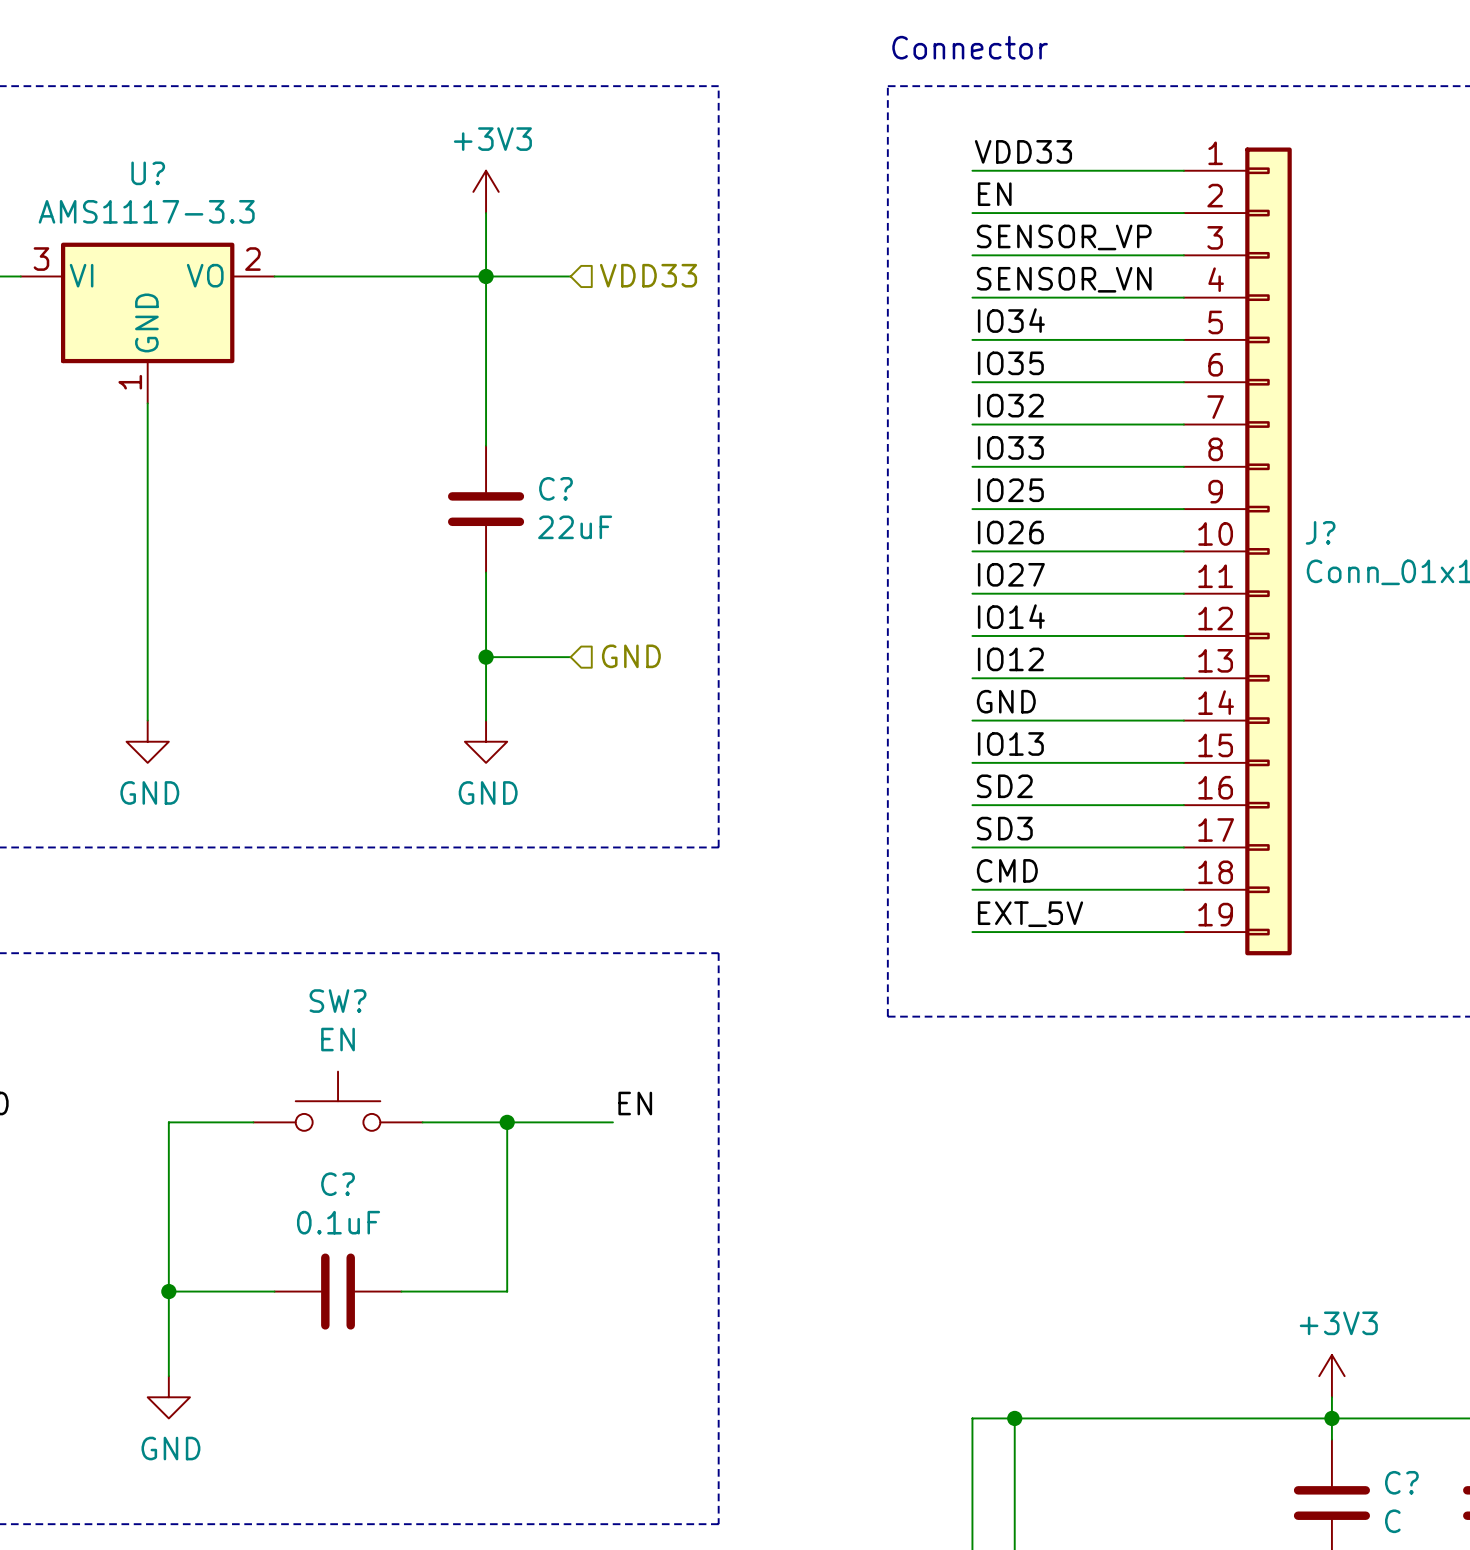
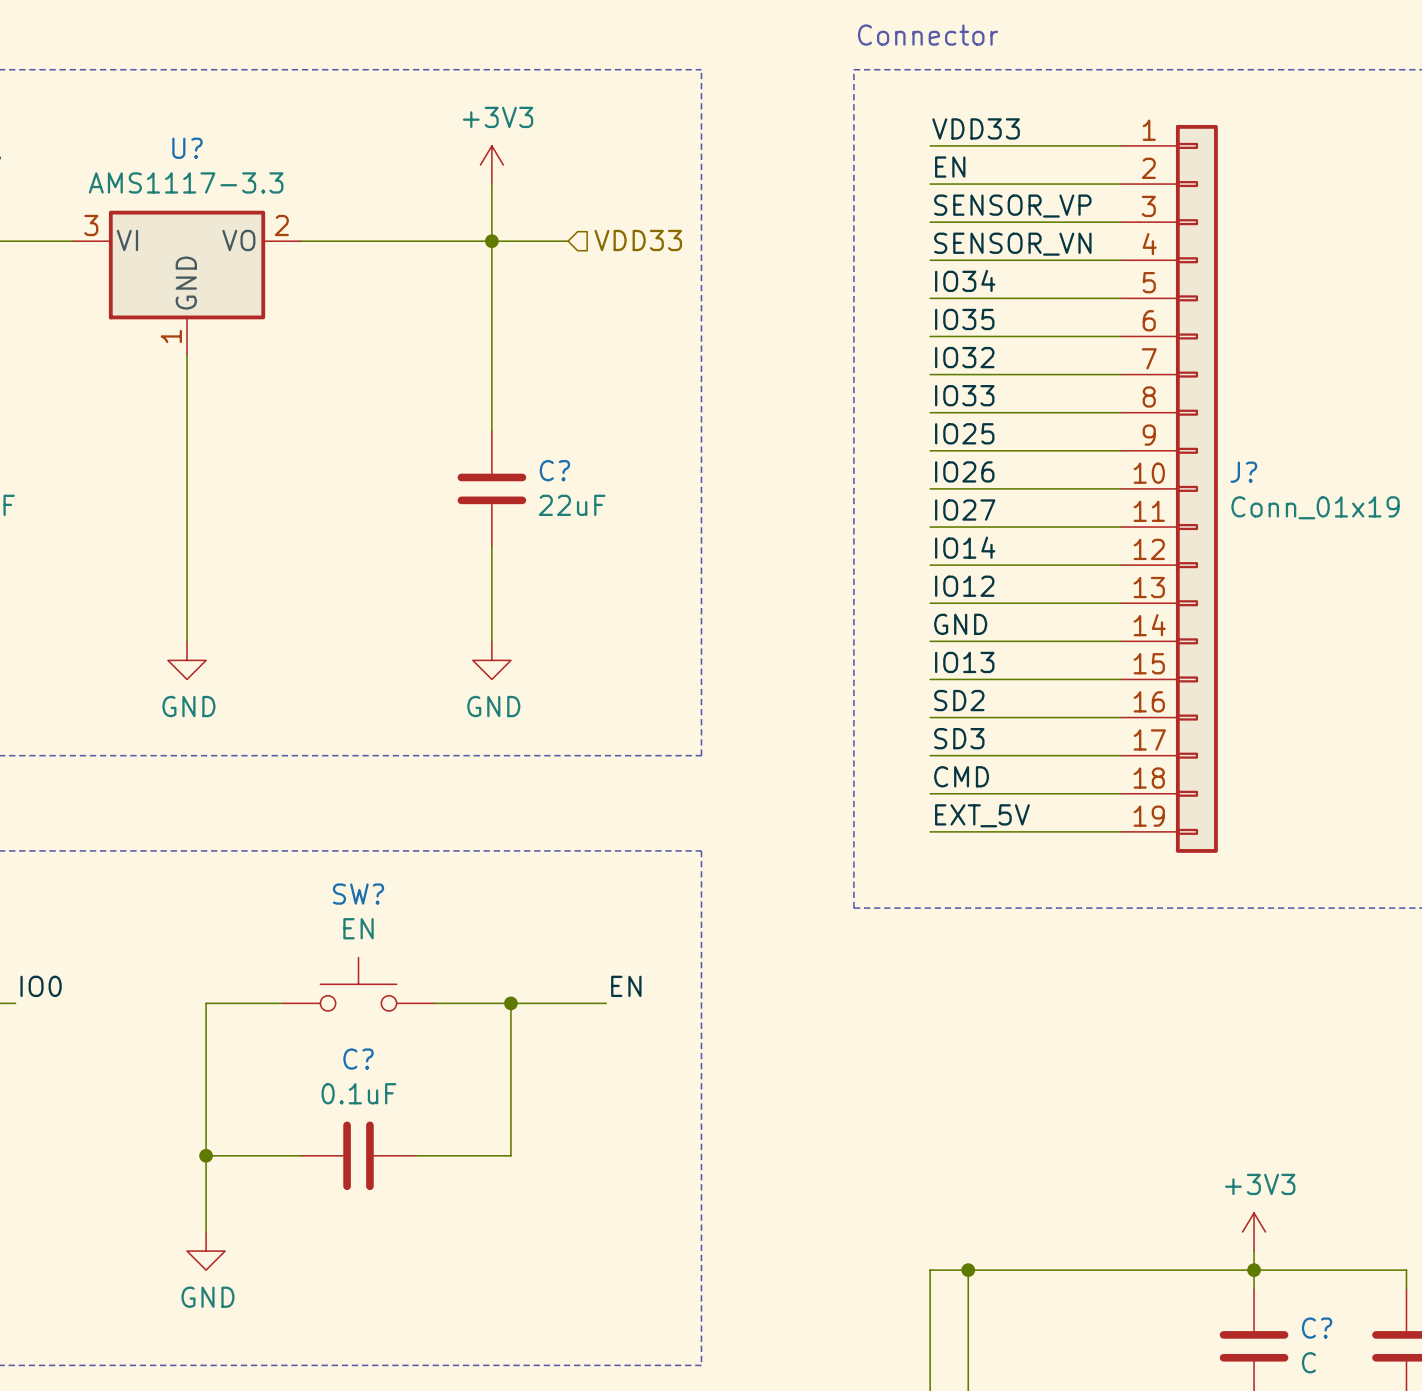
C? position: (486, 509) -> (491, 488)
hierarchical label: GND (631, 656) -> none
wire: (486, 657) (570, 657) -> none
junction: (486, 657) -> none

